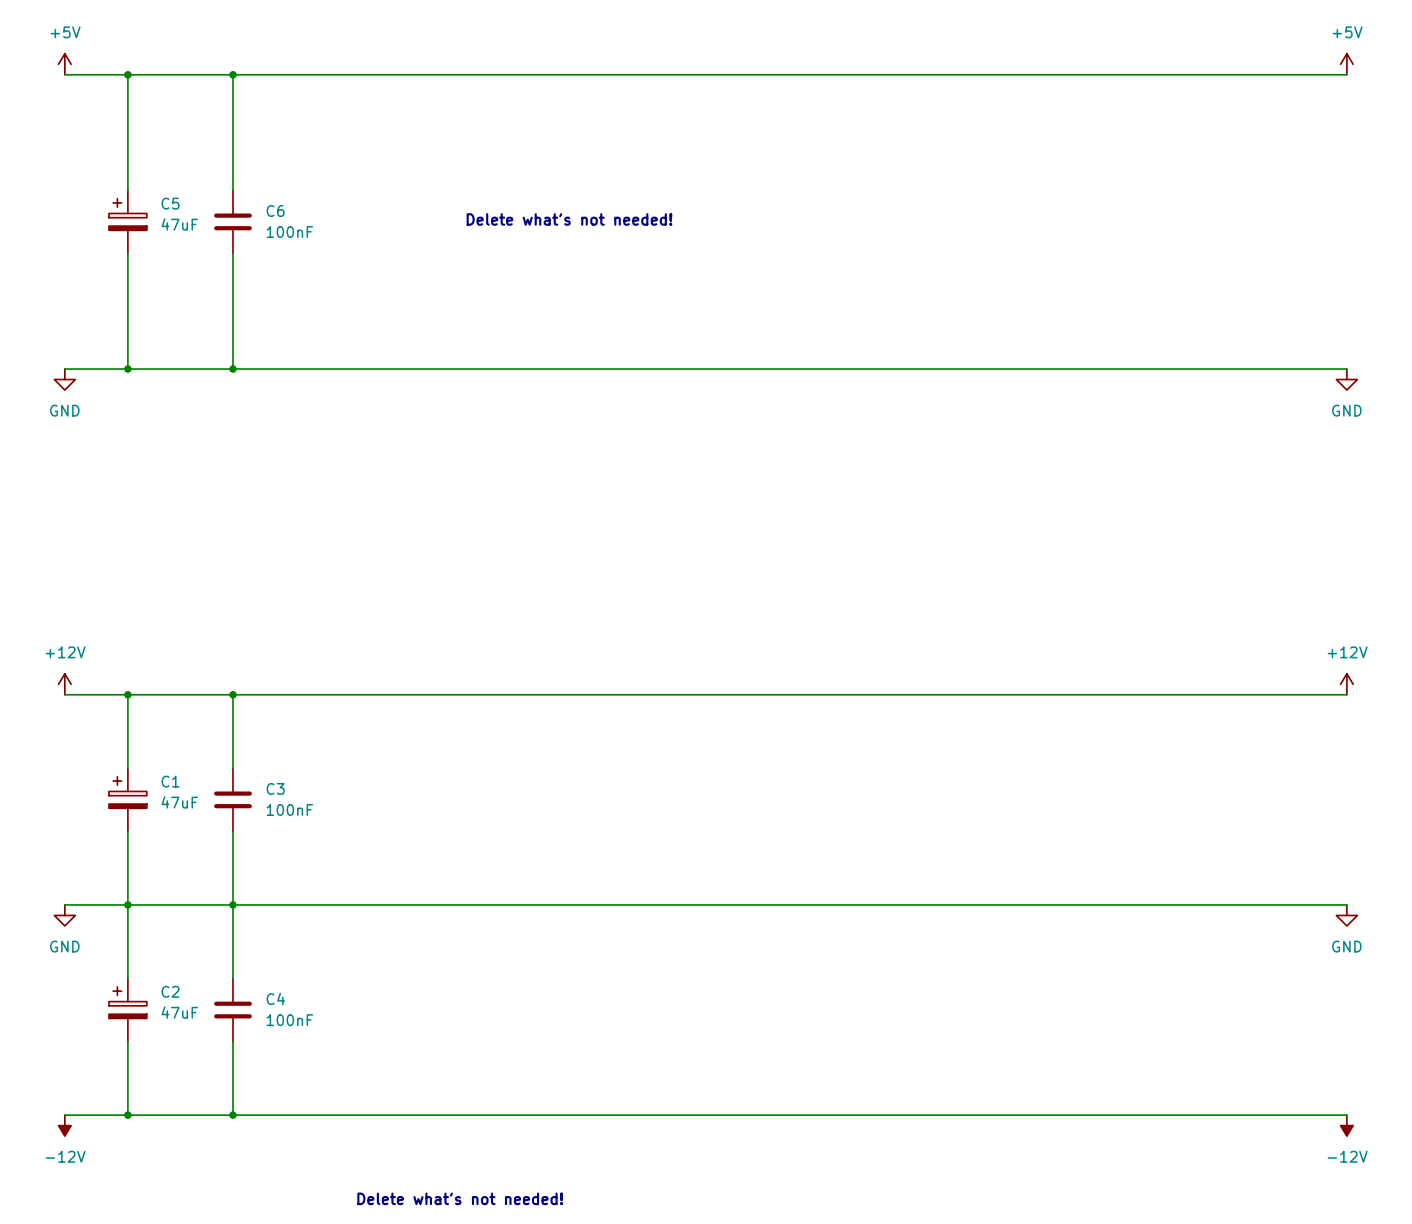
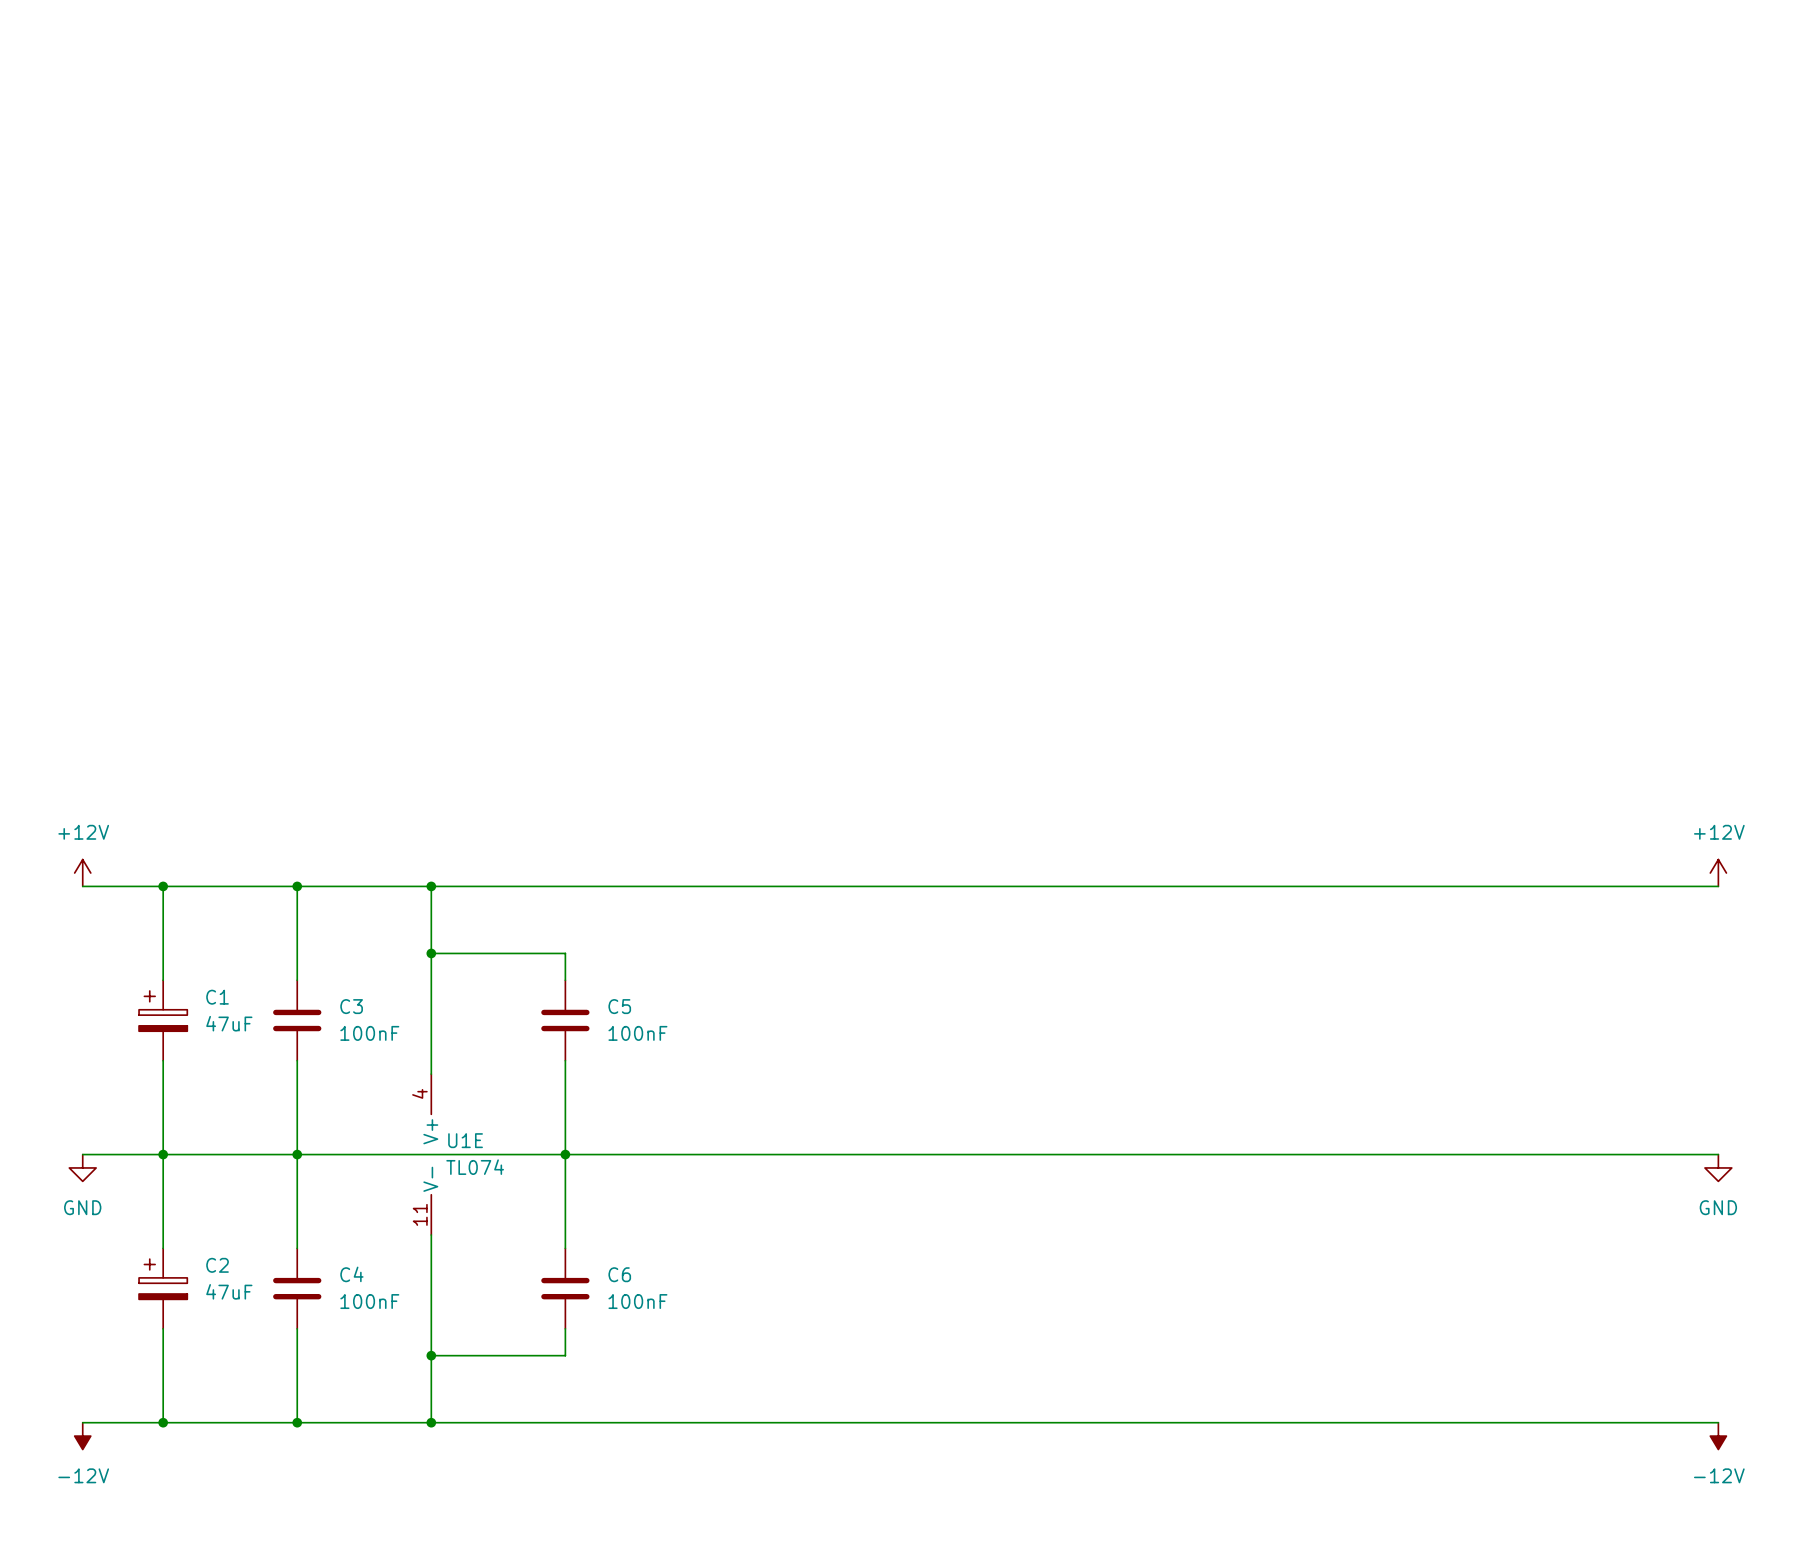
power symbol: +5V (64, 64) -> none
power symbol: +5V (1346, 64) -> none
wire: (64, 74) (1346, 74) -> none
wire: (127, 74) (127, 190) -> none
junction: (127, 74) -> none
wire: (232, 74) (232, 190) -> none
junction: (232, 74) -> none
C5 symbol: [108, 190, 147, 254] -> [541, 980, 590, 1061]
text: Delete what's not needed! (569, 219) -> none
C6 position: (232, 221) -> (565, 1288)
C5 value: 47uF (179, 224) -> 100nF (637, 1033)
wire: (127, 253) (127, 369) -> none
wire: (232, 253) (232, 369) -> none
wire: (64, 369) (1346, 369) -> none
junction: (127, 369) -> none
junction: (232, 369) -> none
power symbol: GND (64, 379) -> none
power symbol: GND (1346, 379) -> none
wire: none -> (431, 886) (431, 1074)
junction: none -> (431, 886)
wire: none -> (431, 953) (565, 953) (565, 980)
junction: none -> (431, 953)
wire: none -> (565, 1060) (565, 1248)
U1E: none -> TL074 (431, 1154)
junction: none -> (565, 1154)
wire: none -> (431, 1235) (431, 1422)
wire: none -> (565, 1328) (565, 1355) (431, 1355)
junction: none -> (431, 1355)
junction: none -> (431, 1422)
text: Delete what's not needed! (460, 1198) -> none

